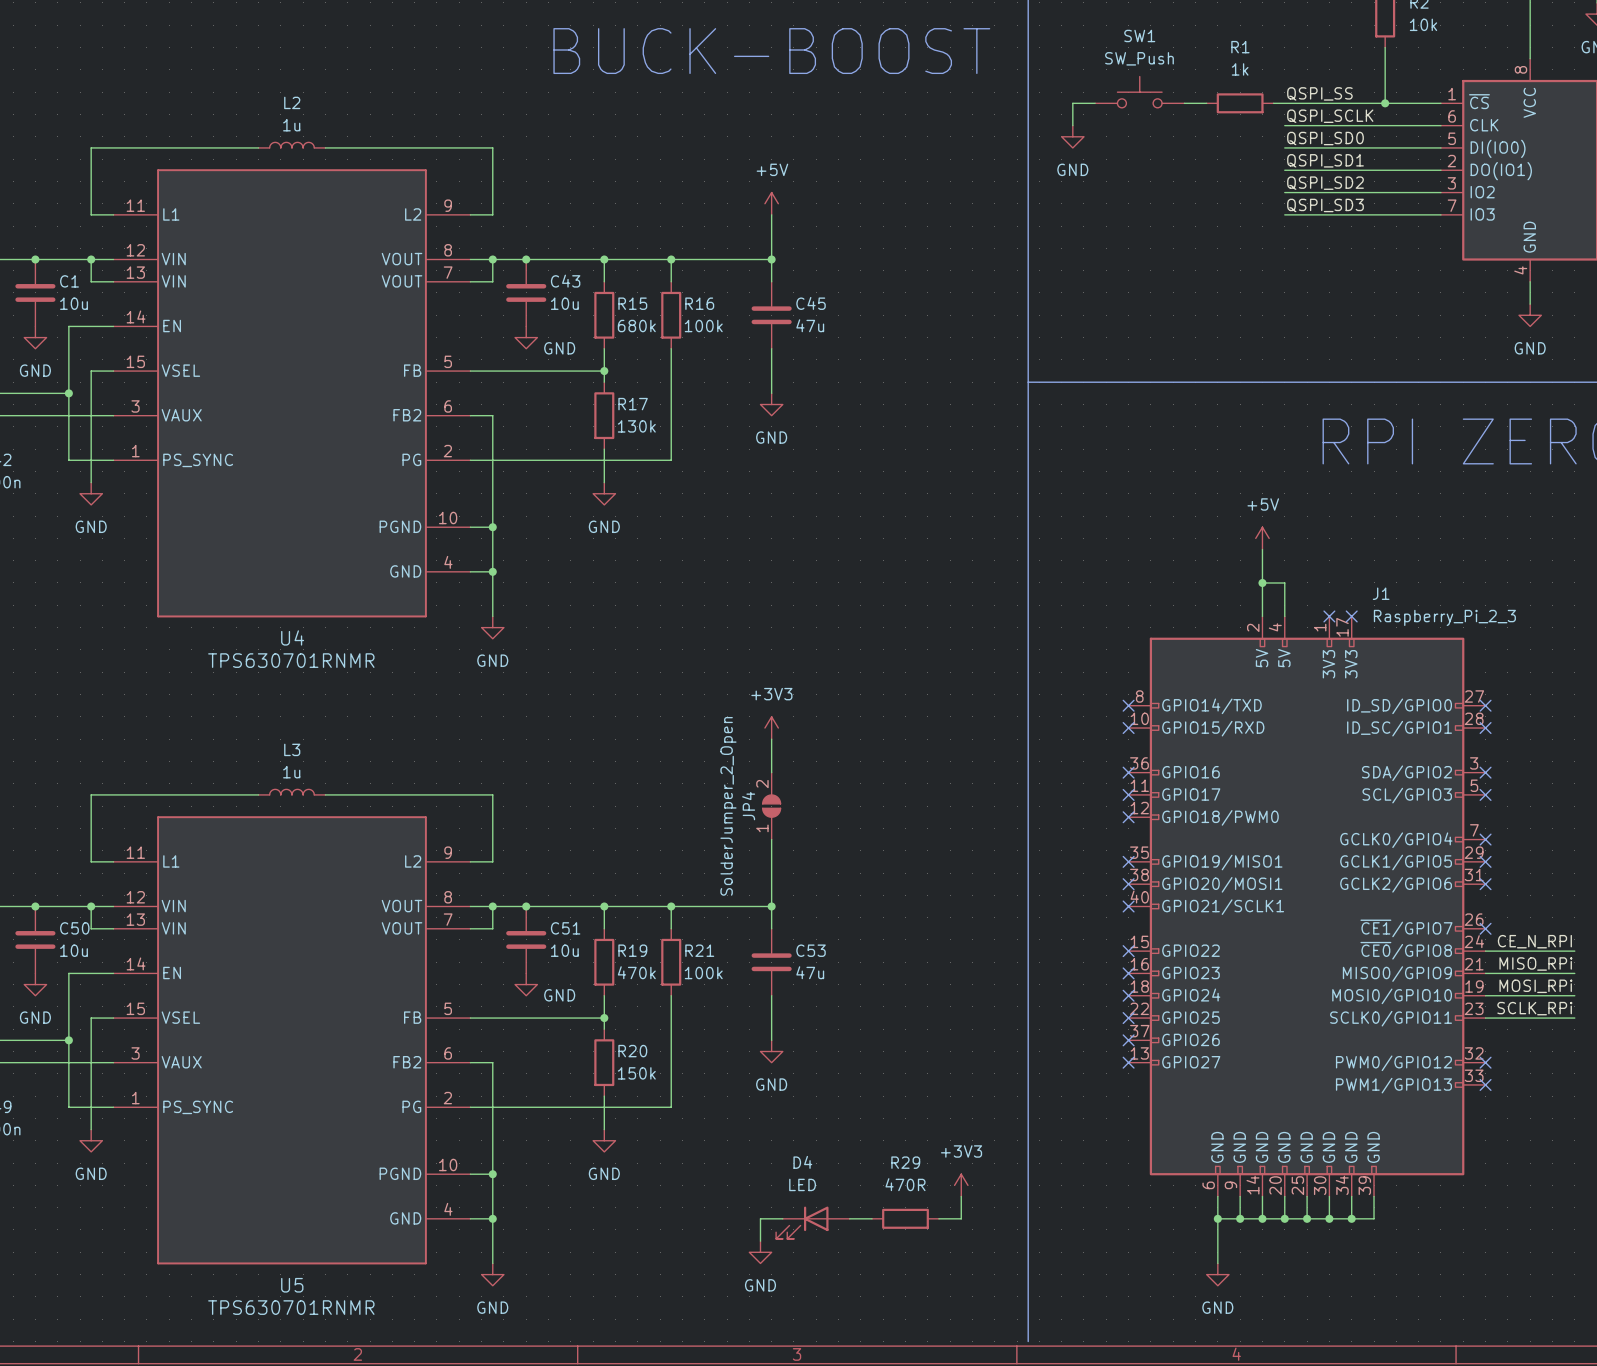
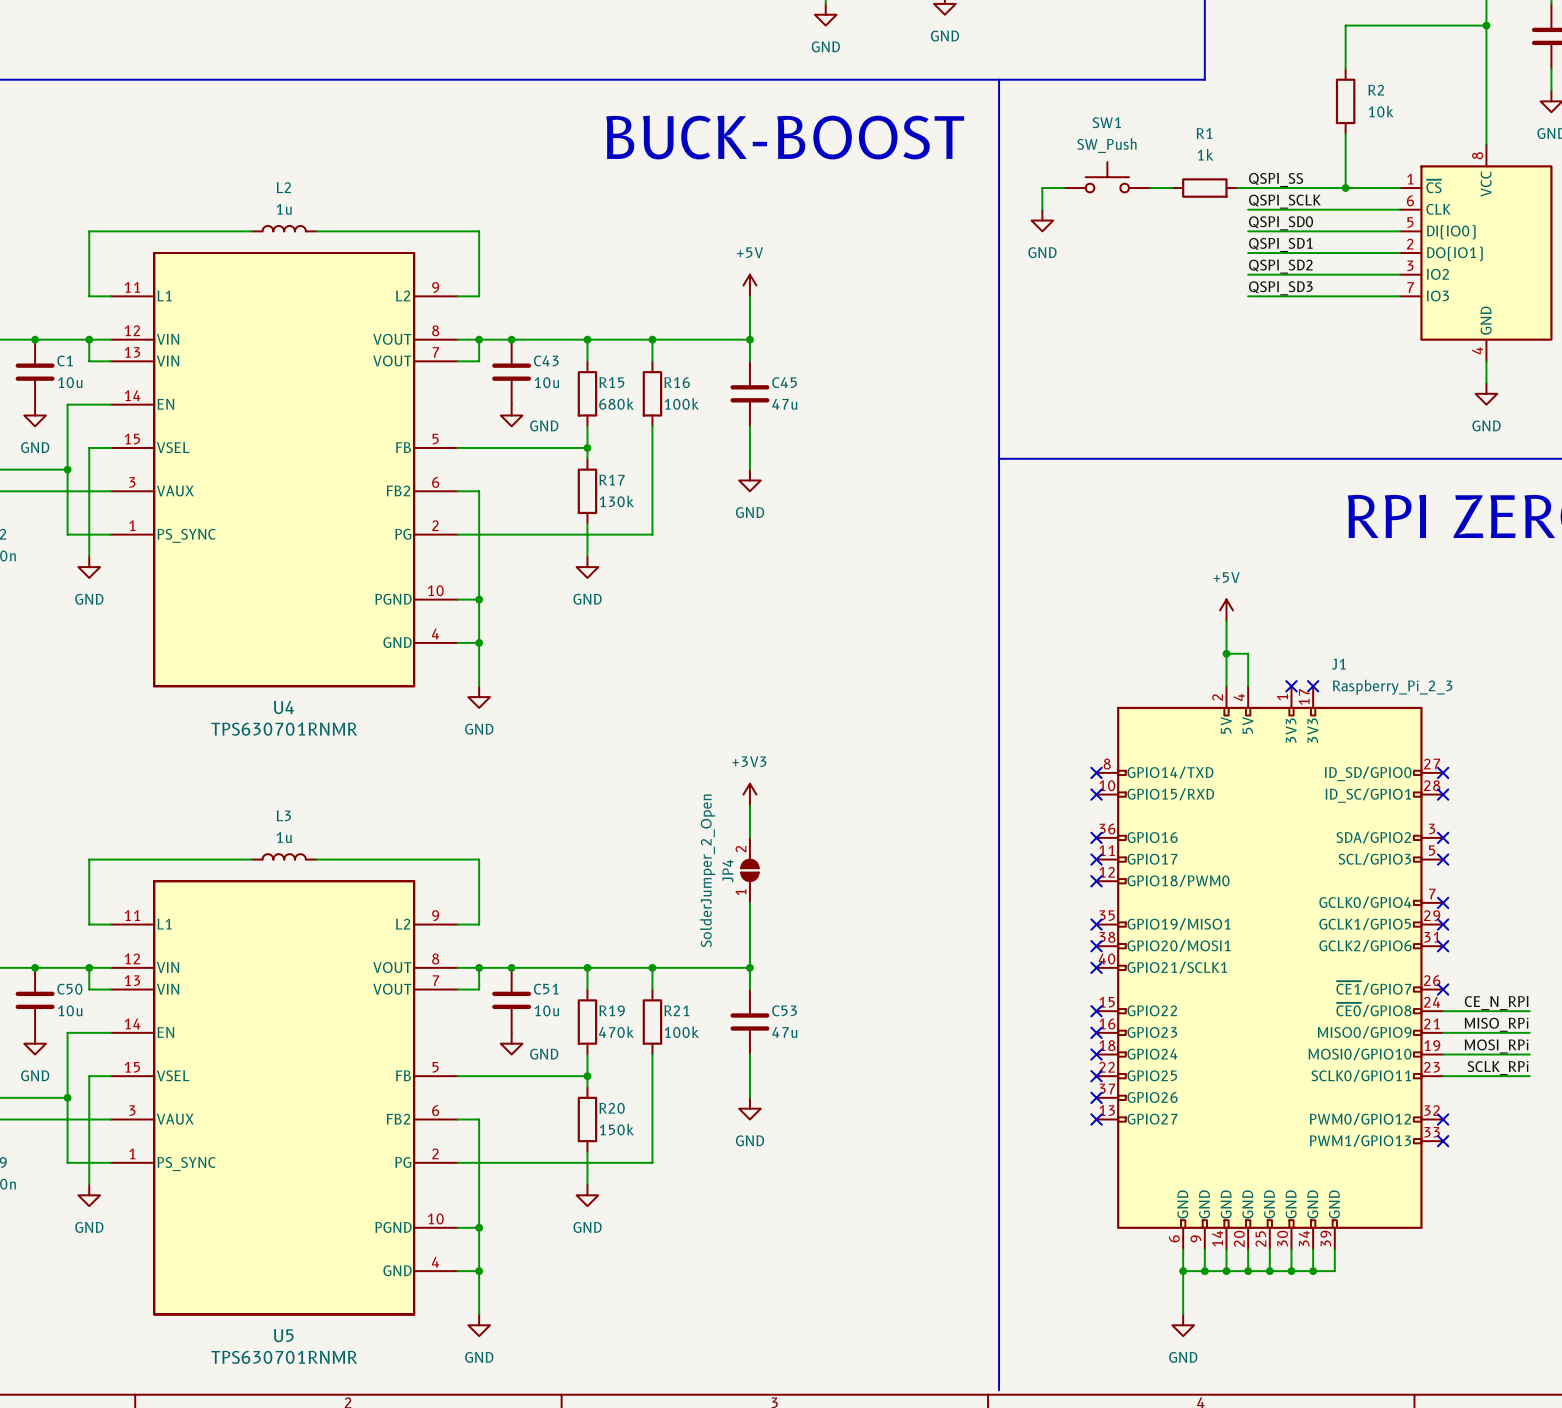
power symbol: +3V3 (961, 1185) -> none
wire: (961, 1196) (961, 1218) (938, 1218) -> none
wire: (782, 1218) (760, 1218) (760, 1241) -> none
wire: (849, 1218) (872, 1218) -> none
R29: 470R (905, 1218) -> none
D4: LED (812, 1222) -> none
power symbol: GND (760, 1252) -> none

